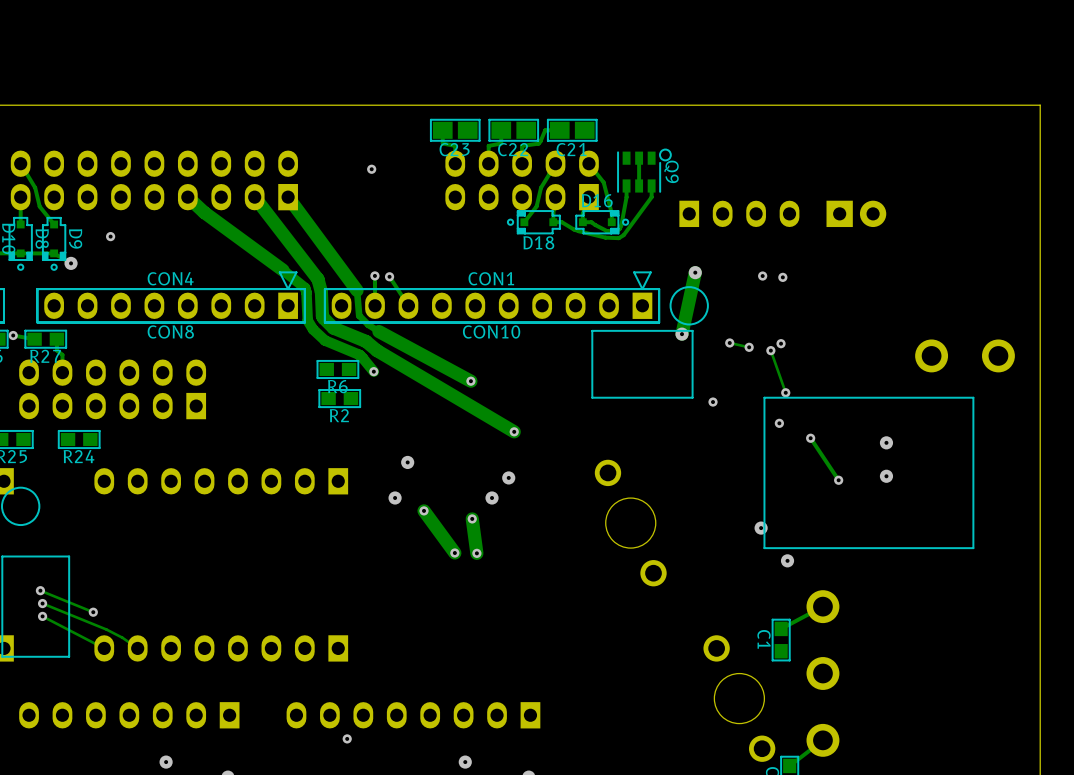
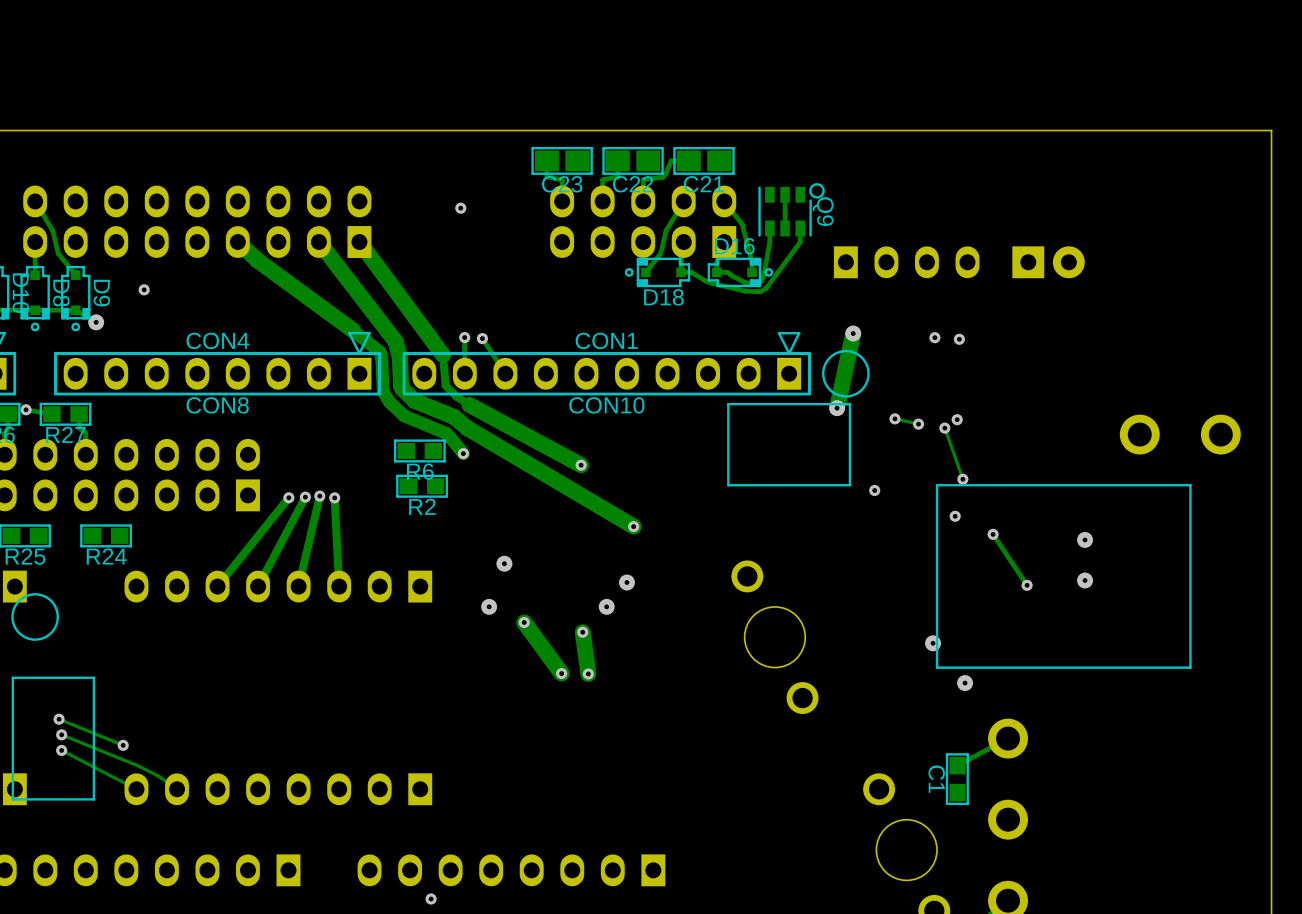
track: none -> (319, 496) (298, 586)
via: none -> (319, 496)
track: none -> (305, 497) (258, 586)
via: none -> (305, 497)
track: none -> (288, 497) (217, 586)
via: none -> (288, 497)
track: none -> (334, 497) (339, 586)
via: none -> (334, 497)

